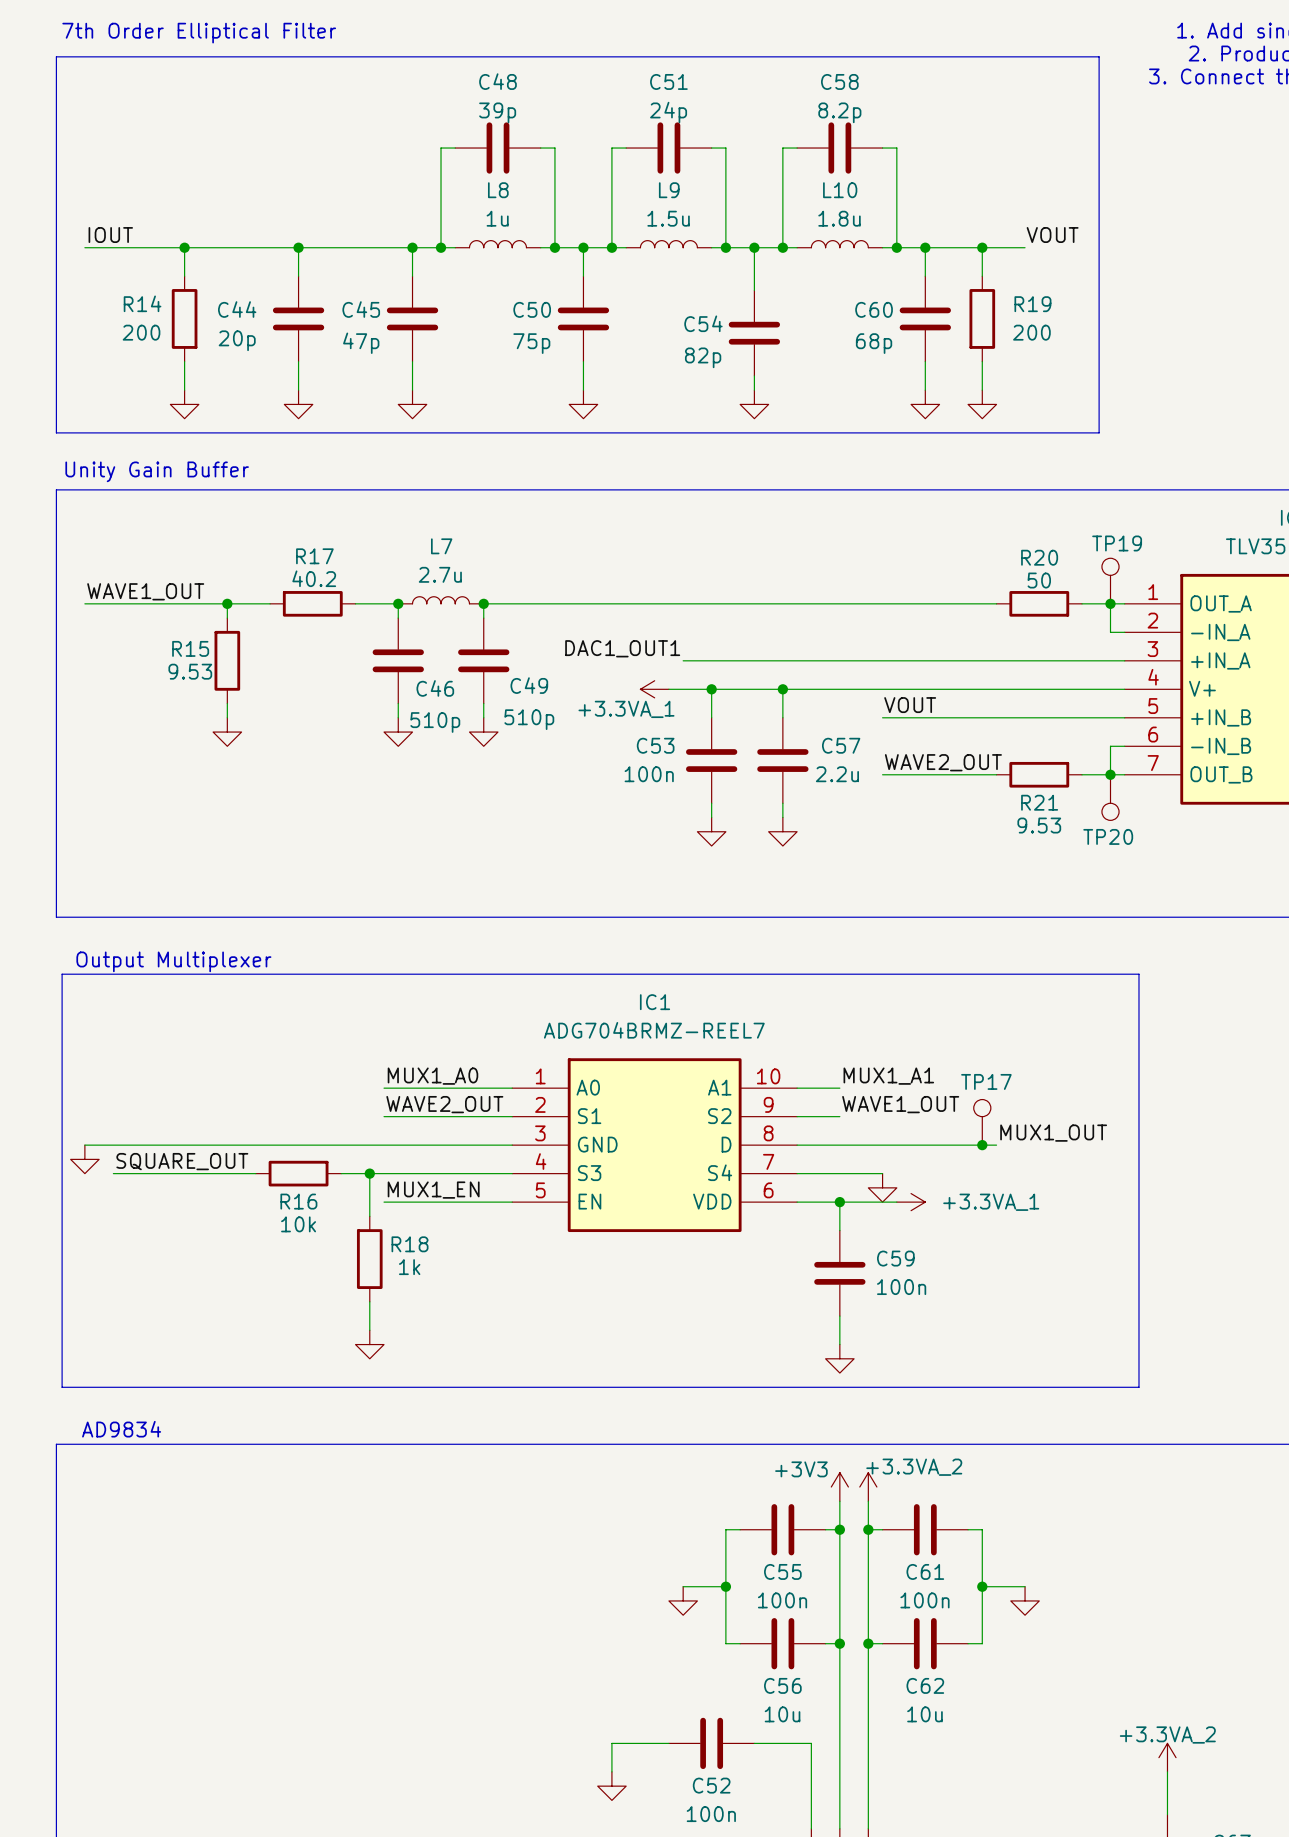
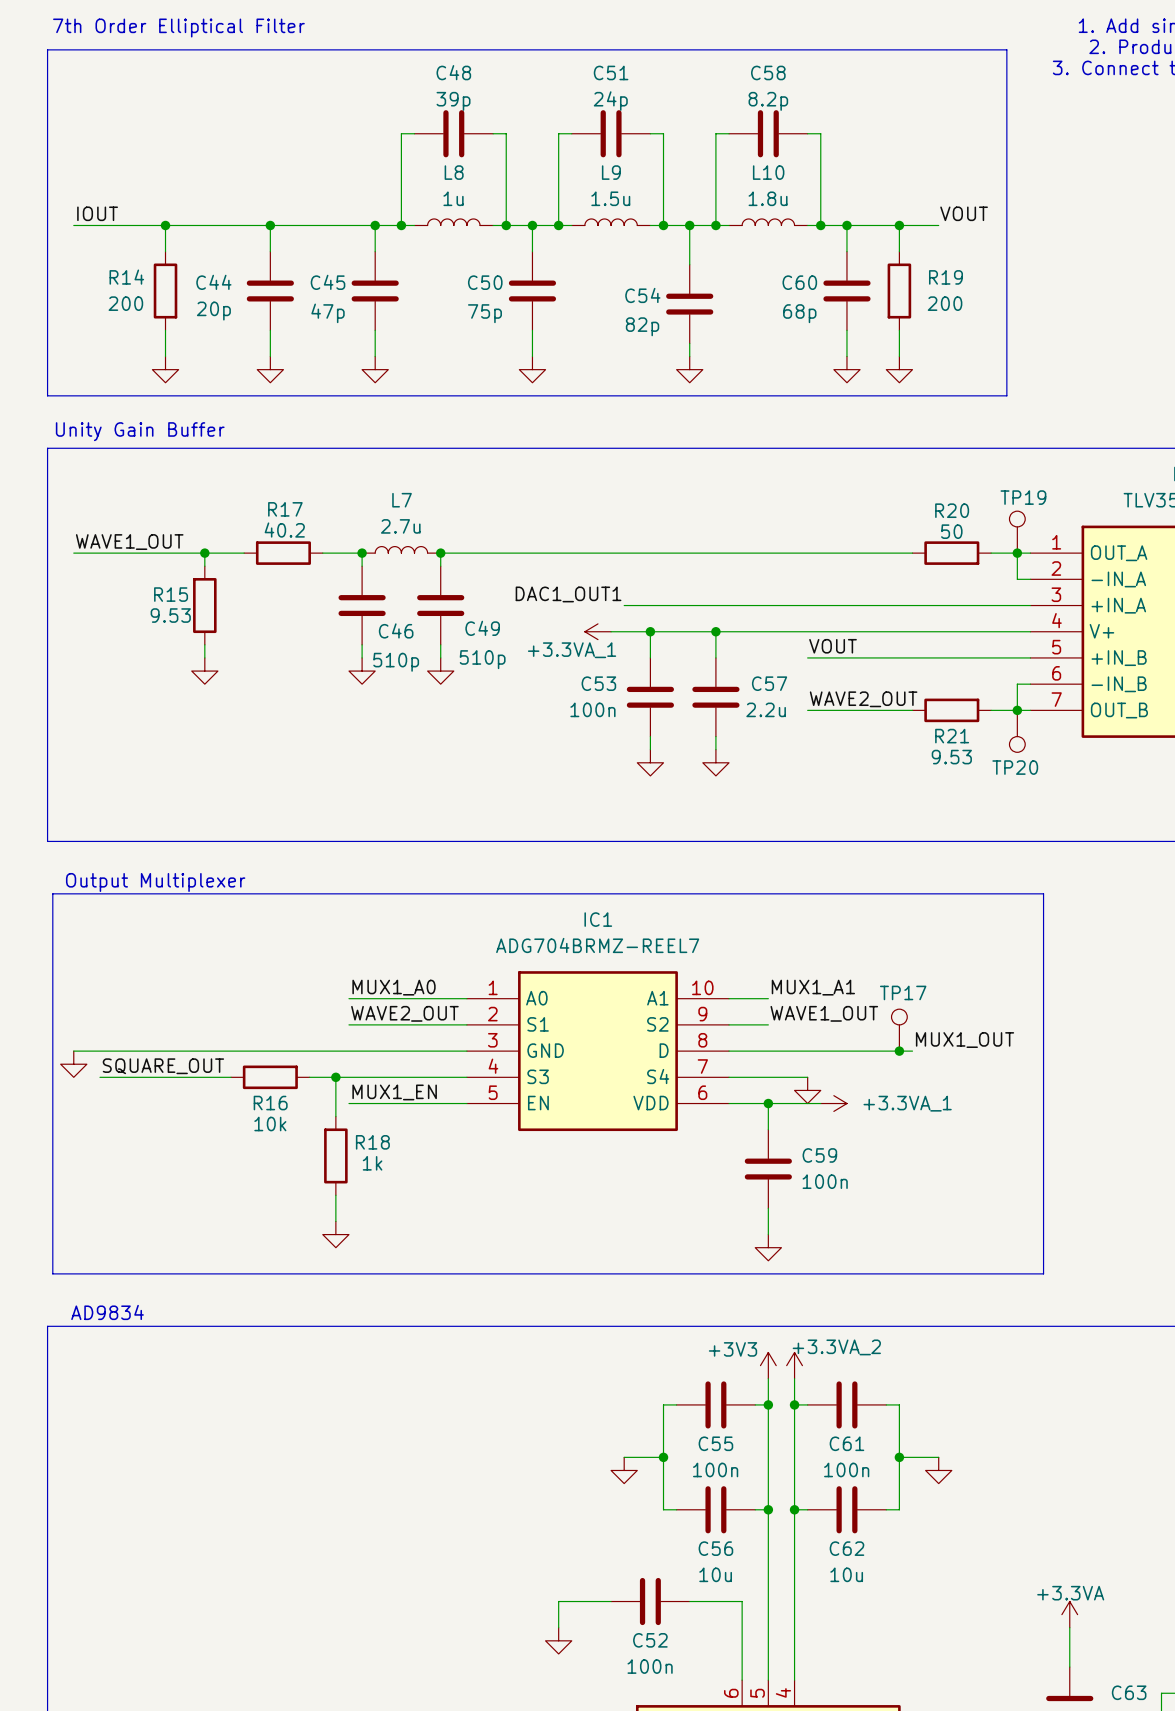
power symbol: +3.3VA_2 (1167, 1757) -> +3.3VA (1069, 1614)

